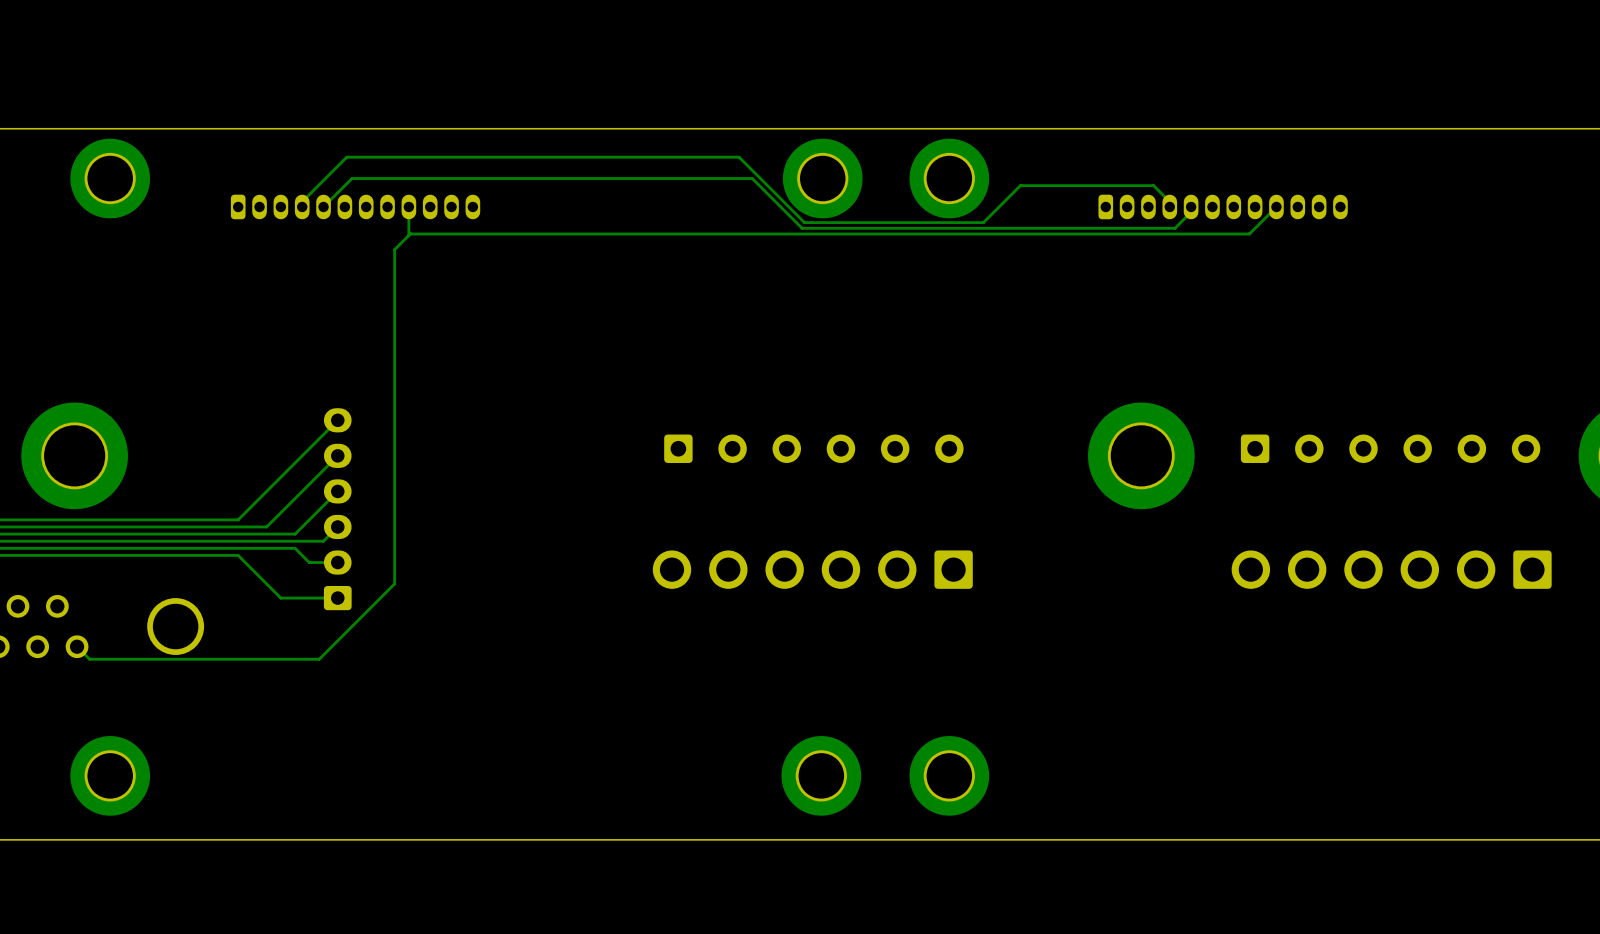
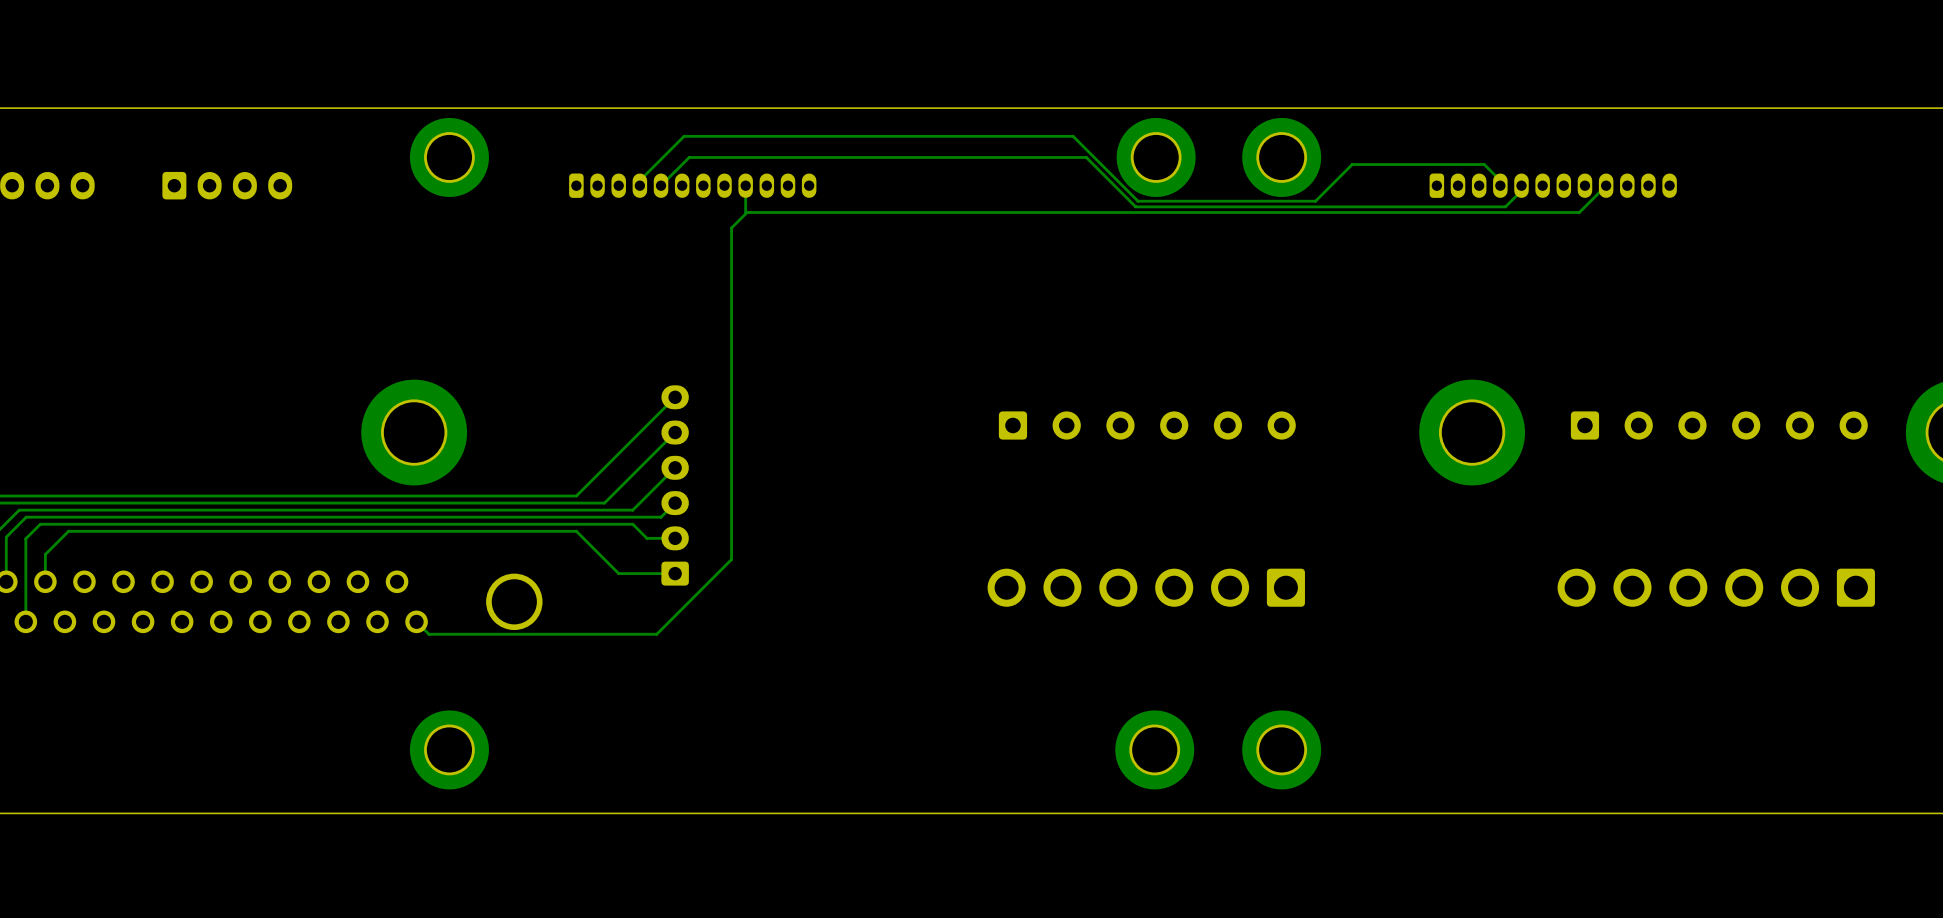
part position: (812, 569) -> (1146, 587)
part position: (1391, 569) -> (1716, 587)

